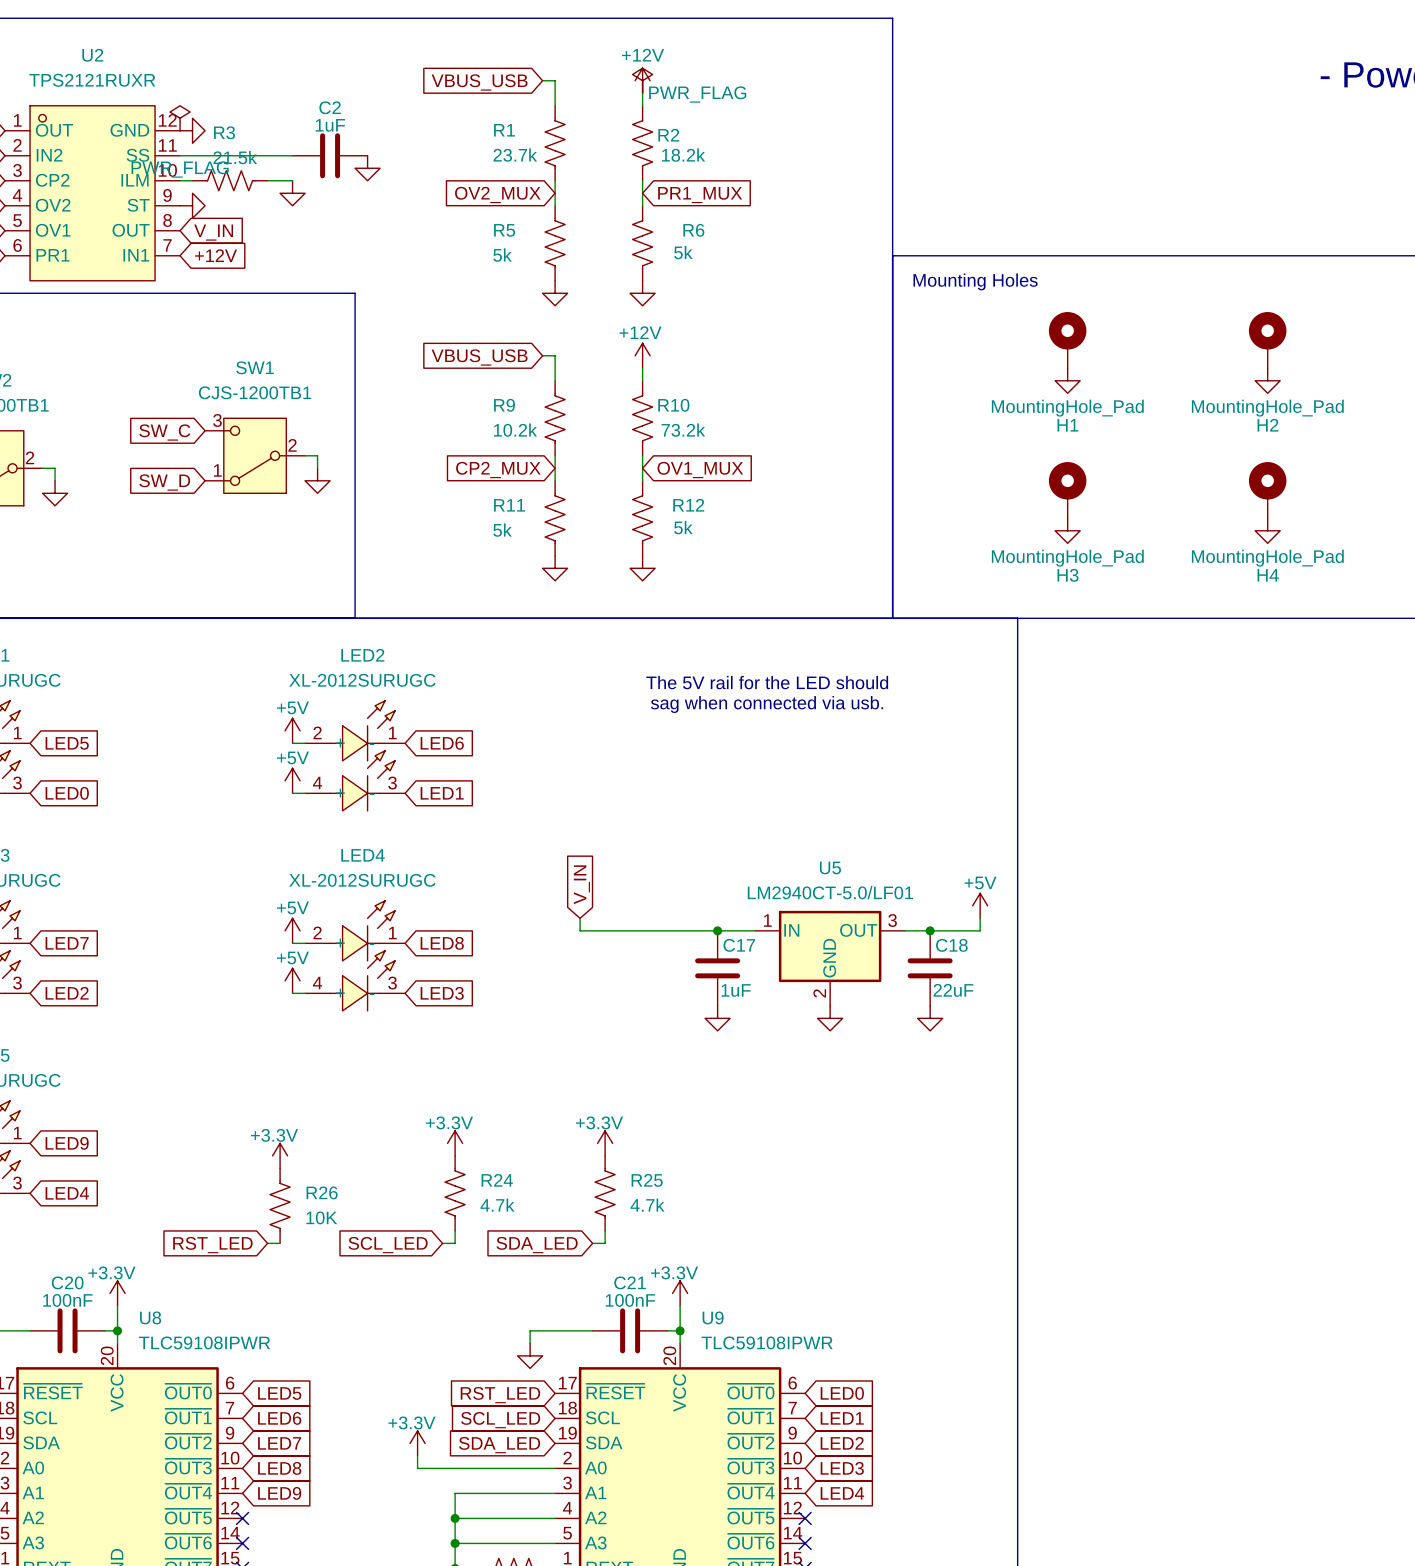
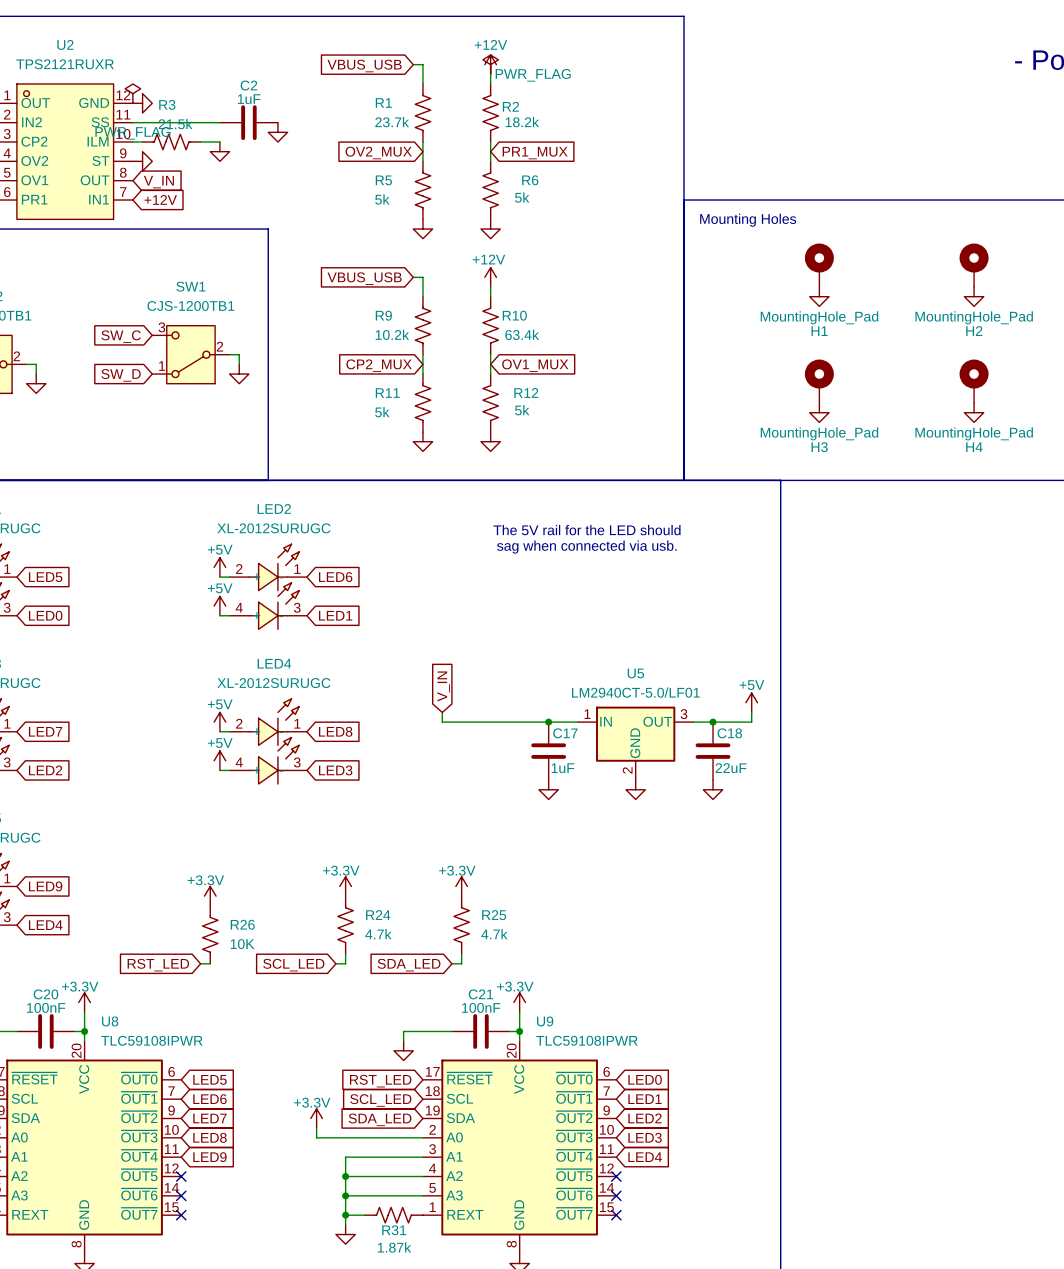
R10 value: 73.2k (683, 430) -> 63.4k (522, 334)

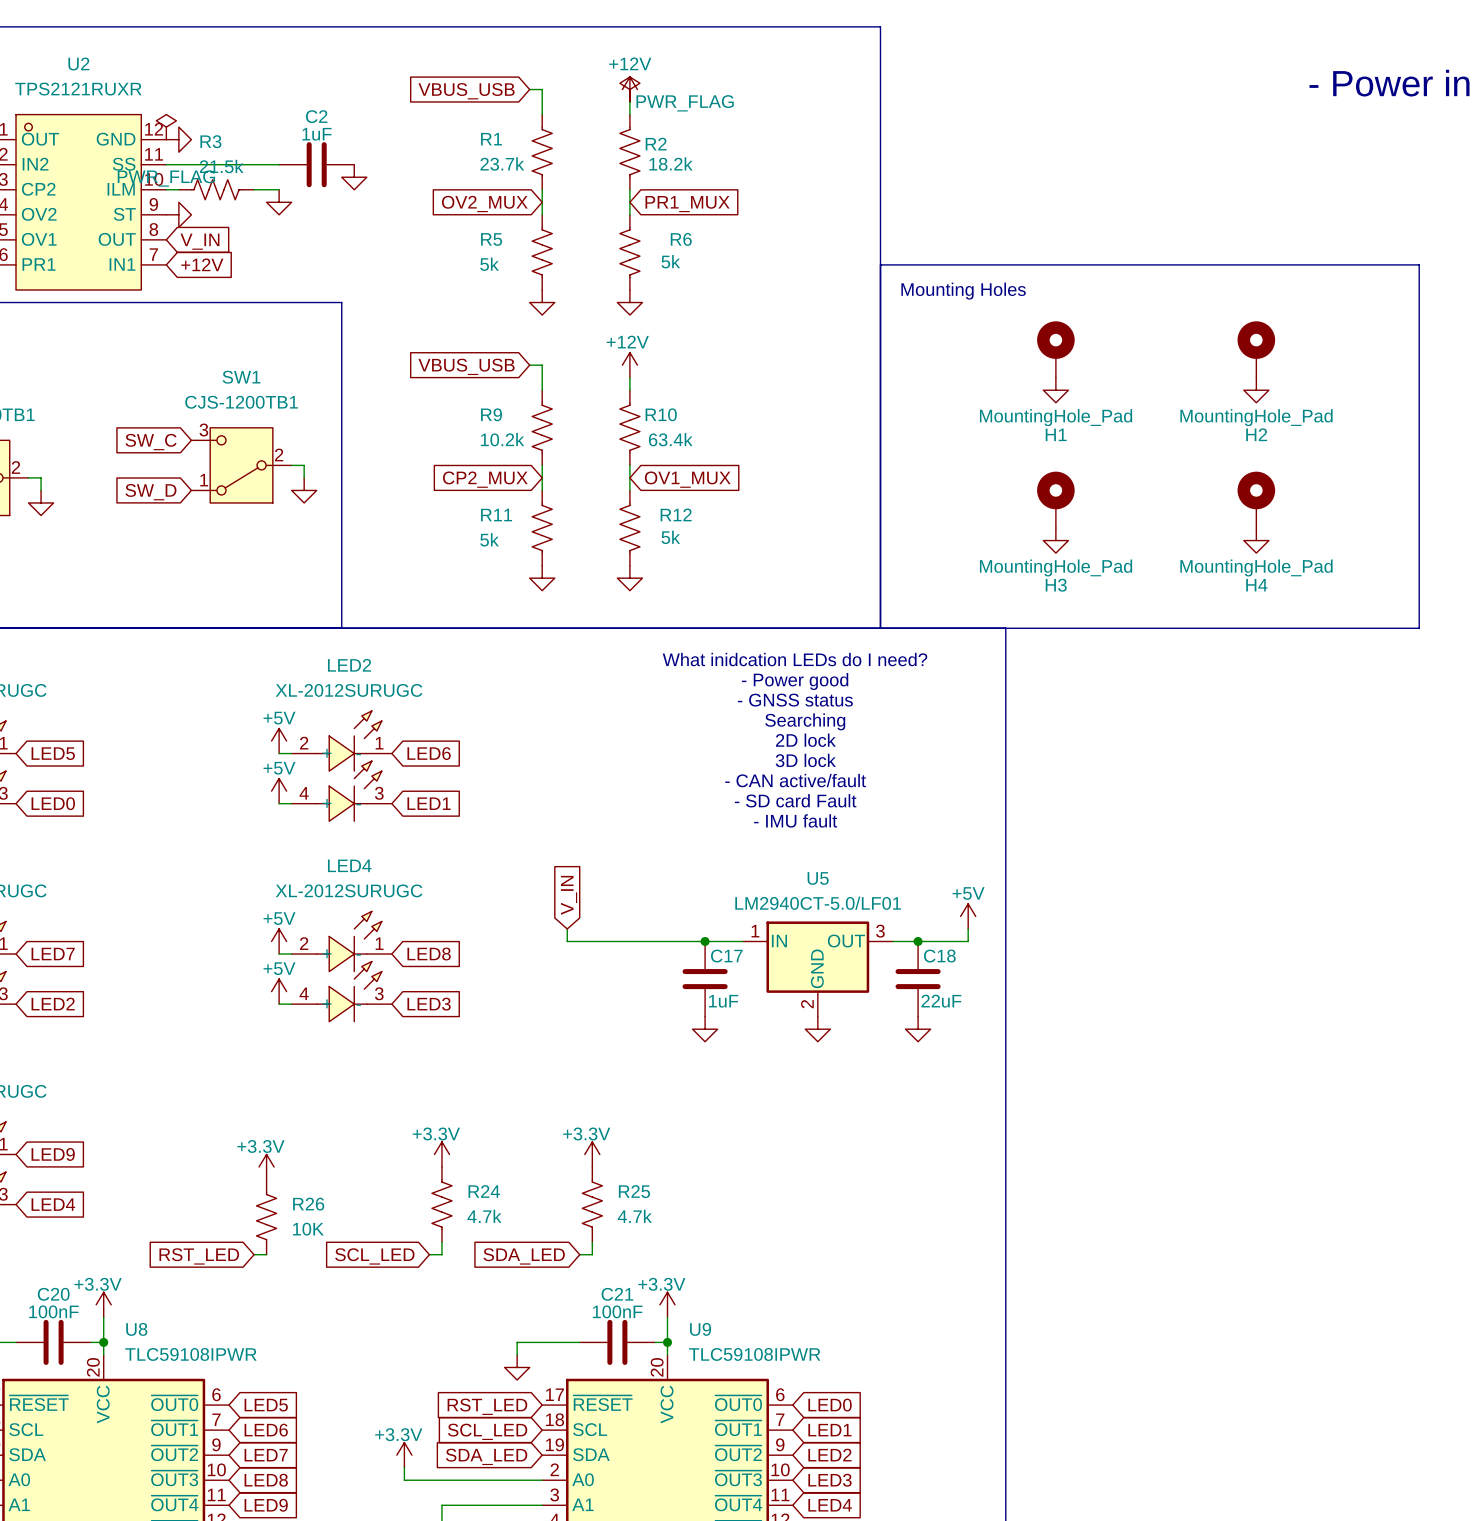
text: none -> What inidcation LEDs do I need? (794, 659)
text: none -> - Power good (795, 681)
text: The 5V rail for the LED should (587, 530) -> none
text: none -> - GNSS status (795, 700)
text: sag when connected via usb. (586, 547) -> none
text: none -> Searching (805, 721)
text: none -> 2D lock (805, 740)
text: none -> 3D lock (805, 760)
text: none -> - CAN active/fault (795, 780)
text: none -> - SD card Fault (795, 800)
text: none -> - IMU fault (795, 820)

